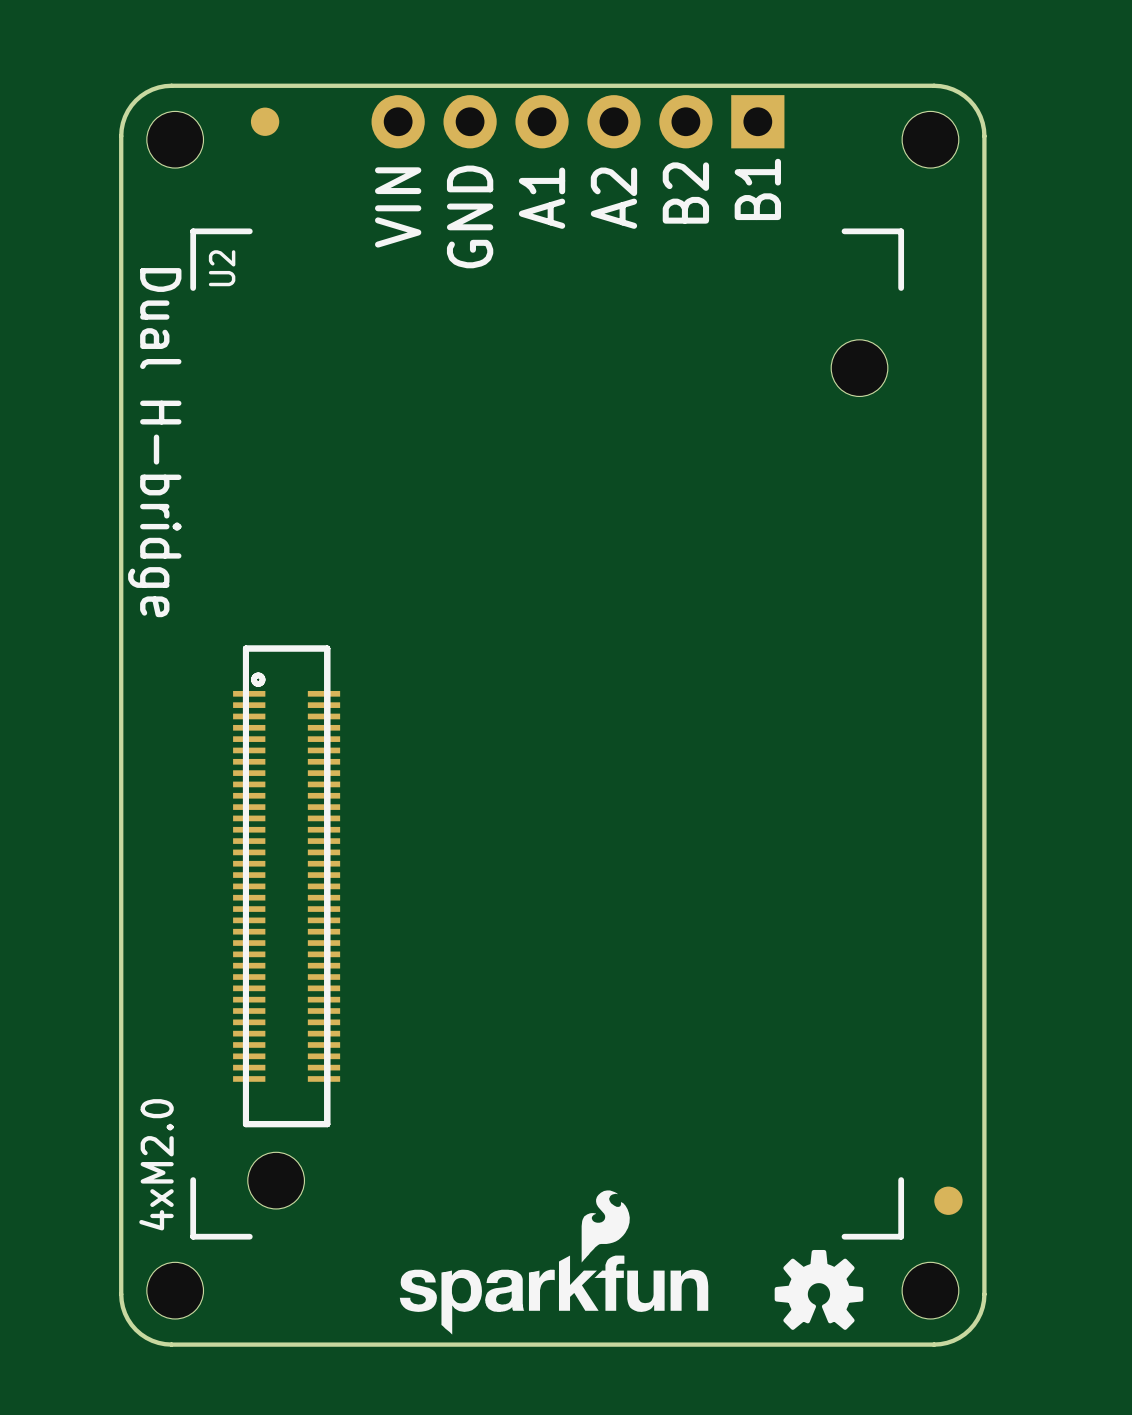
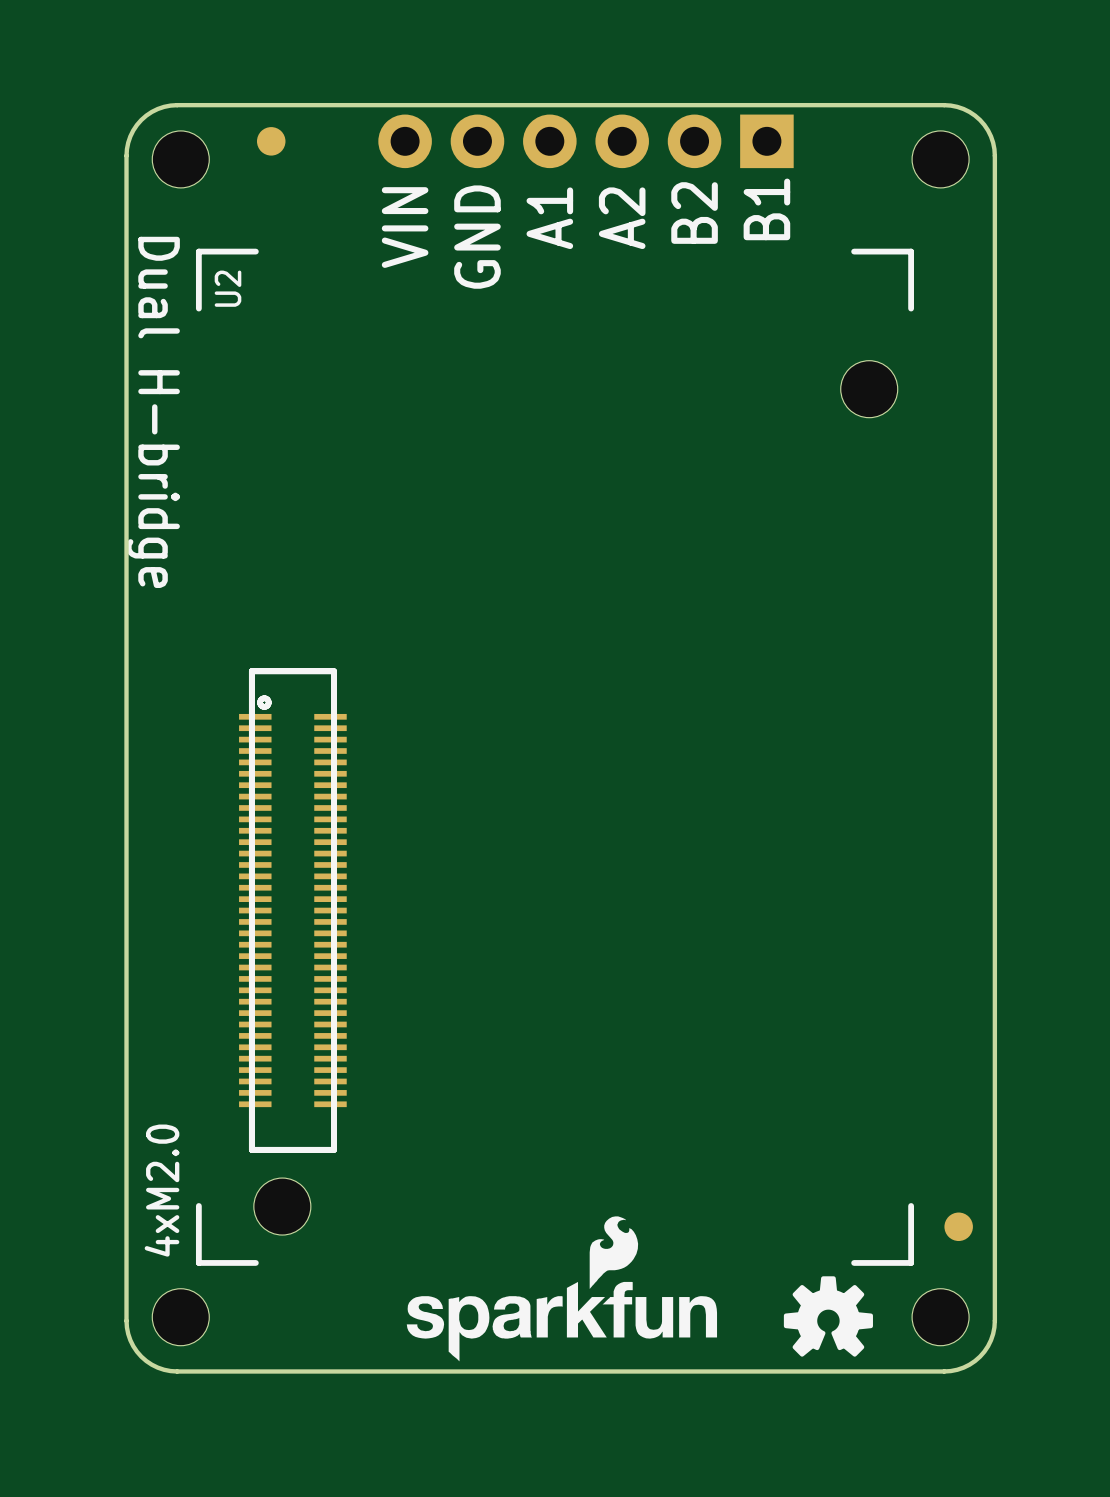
text position: Dual H-bridge (154, 442) -> Dual H-bridge (153, 412)

